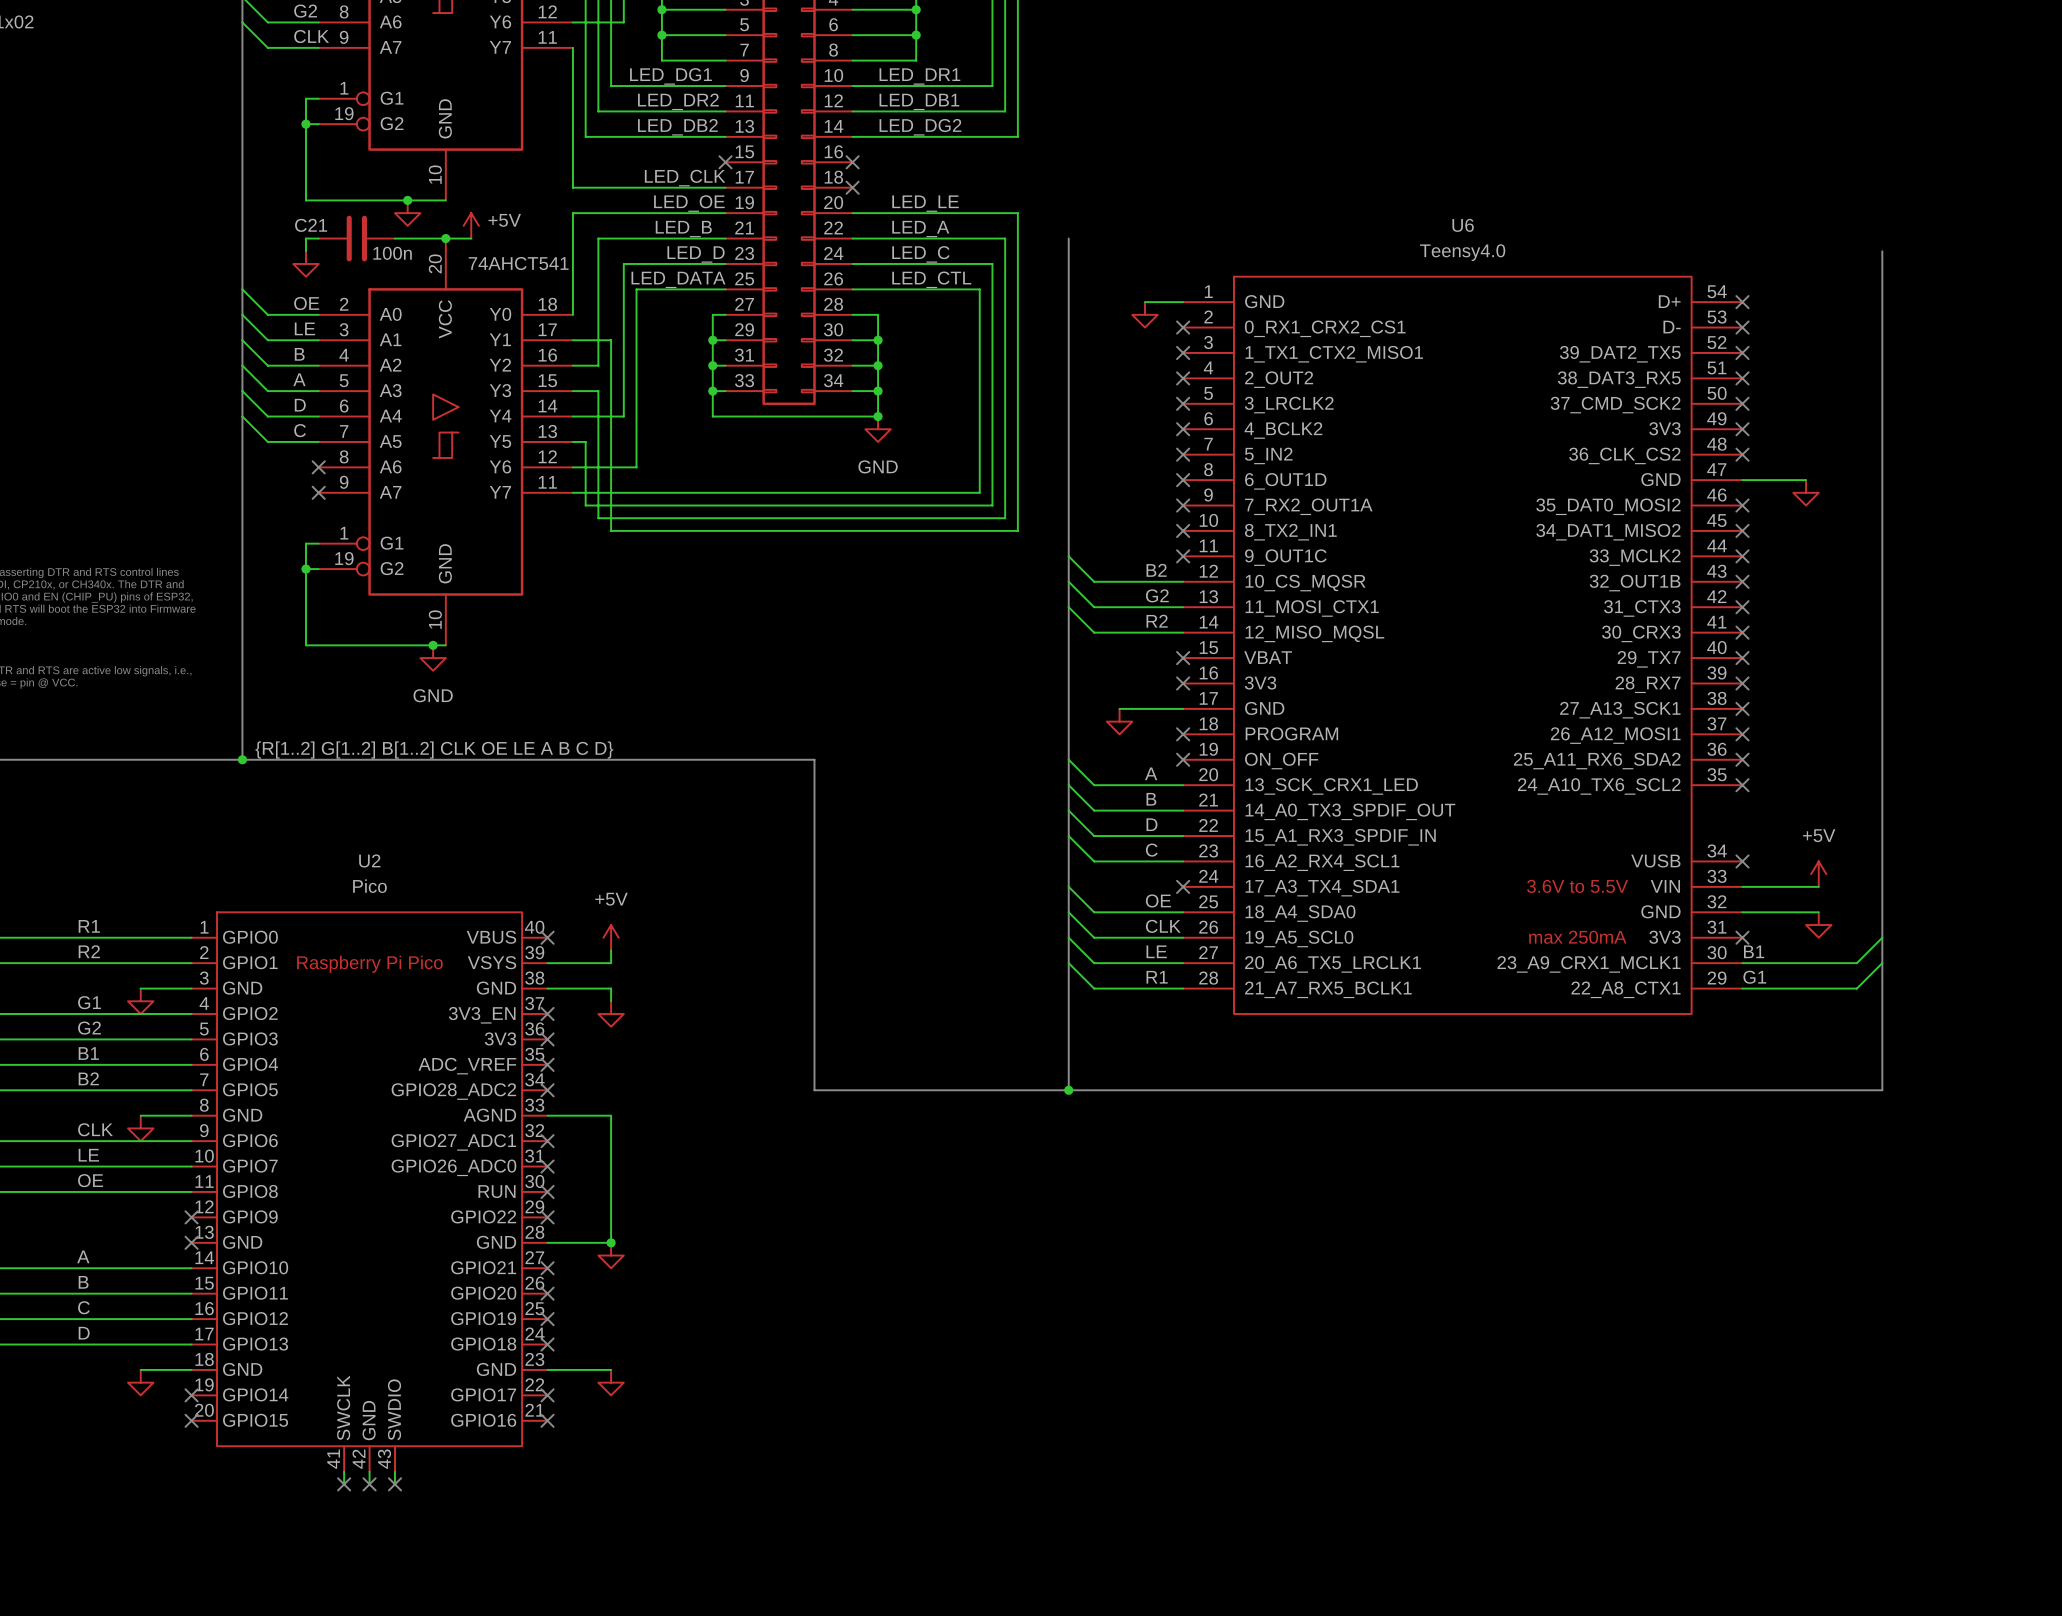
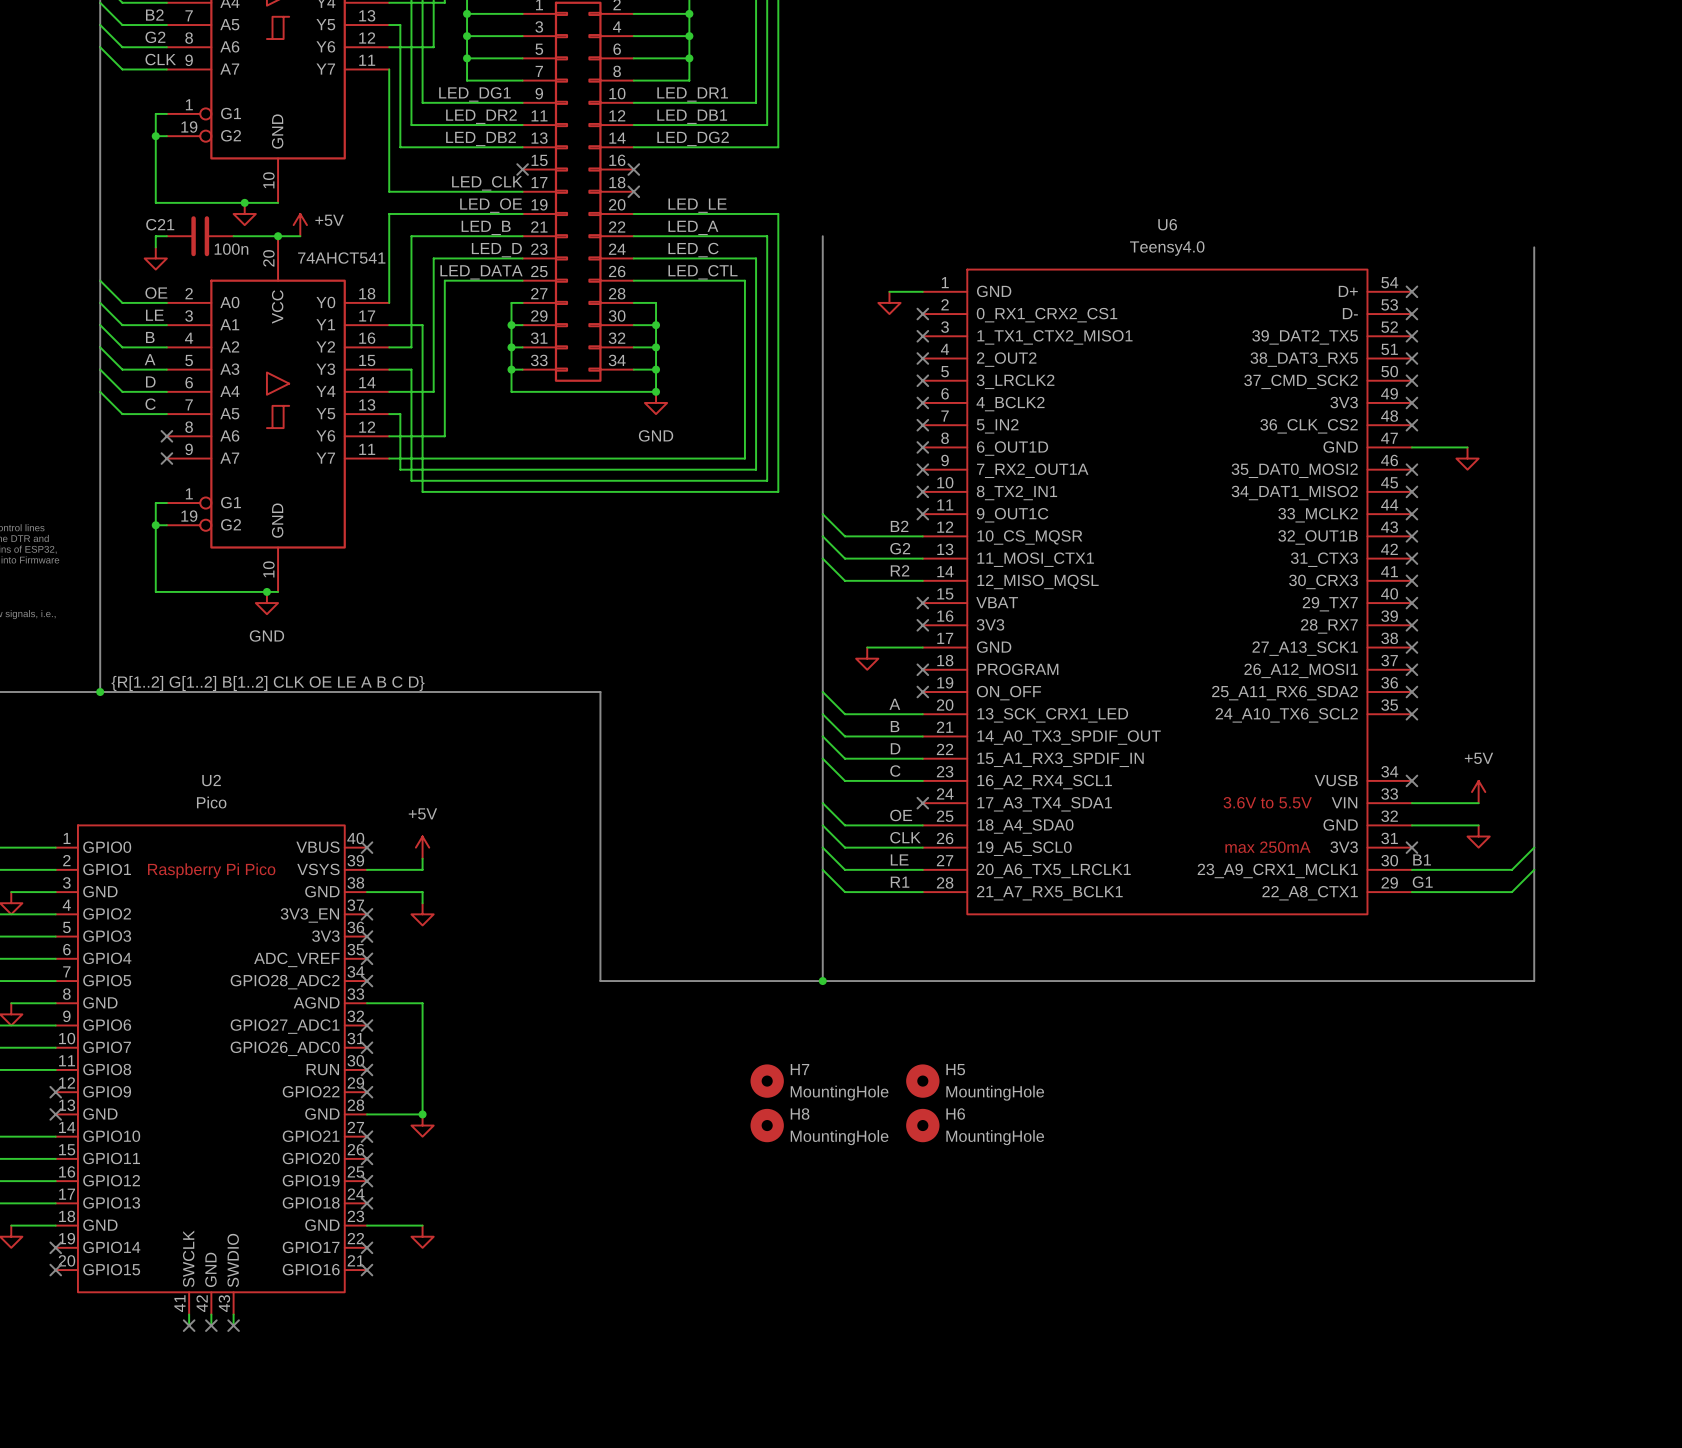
H7: none -> MountingHole (767, 1081)
H5: none -> MountingHole (922, 1081)
H8: none -> MountingHole (767, 1125)
H6: none -> MountingHole (922, 1125)

